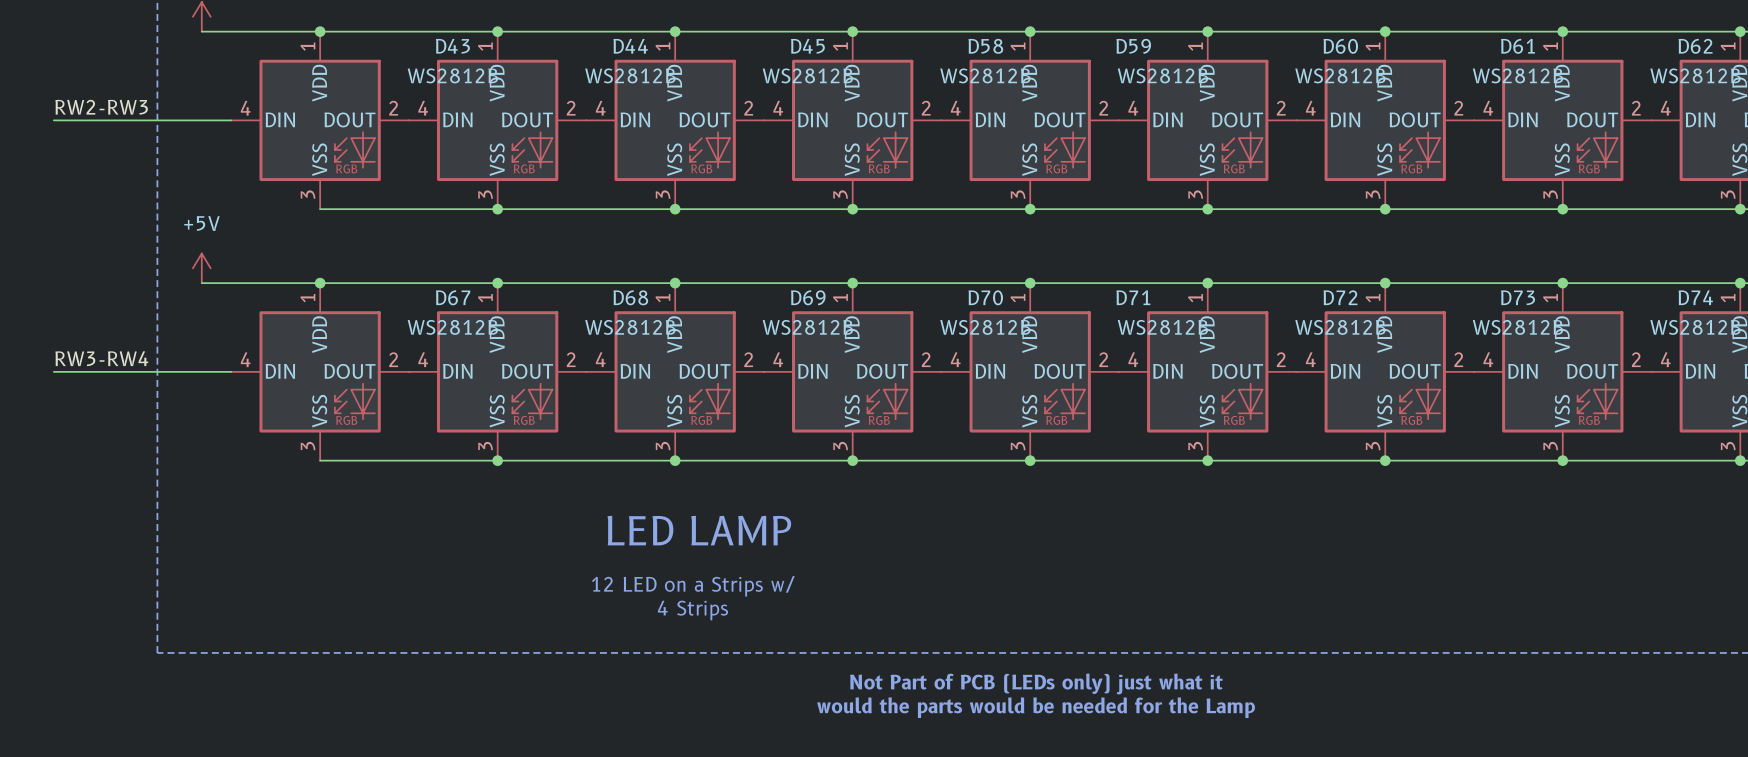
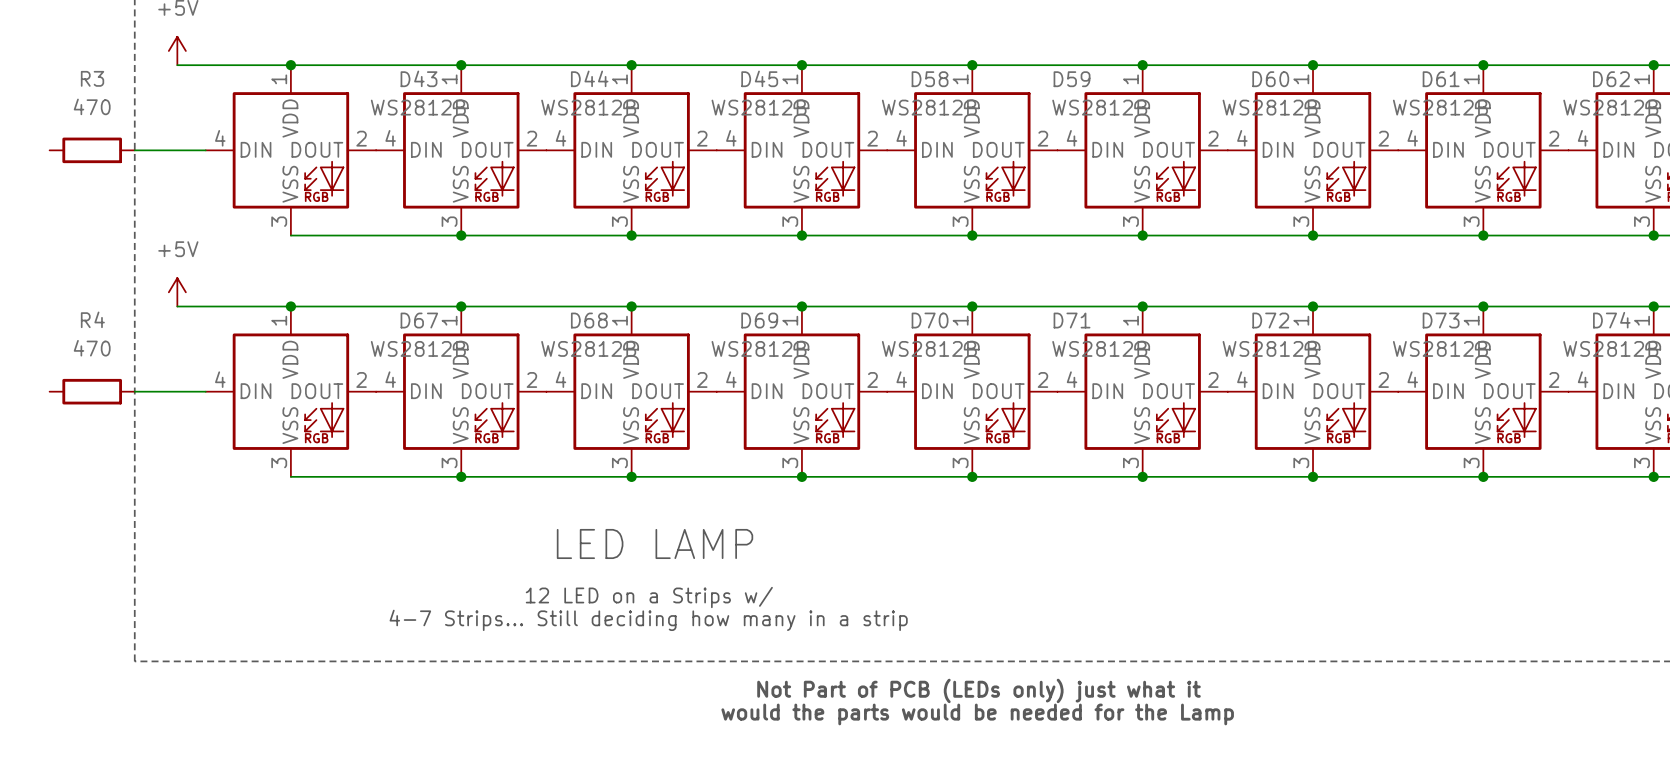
label: RW2-RW3 (101, 107) -> none
wire: (53, 120) (157, 120) -> none
R3: none -> 470 (92, 150)
label: RW3-RW4 (101, 358) -> none
wire: (53, 371) (157, 371) -> none
R4: none -> 470 (92, 391)
text: 4 Strips (692, 610) -> 4-7 Strips... Still deciding how many in a strip (648, 620)

